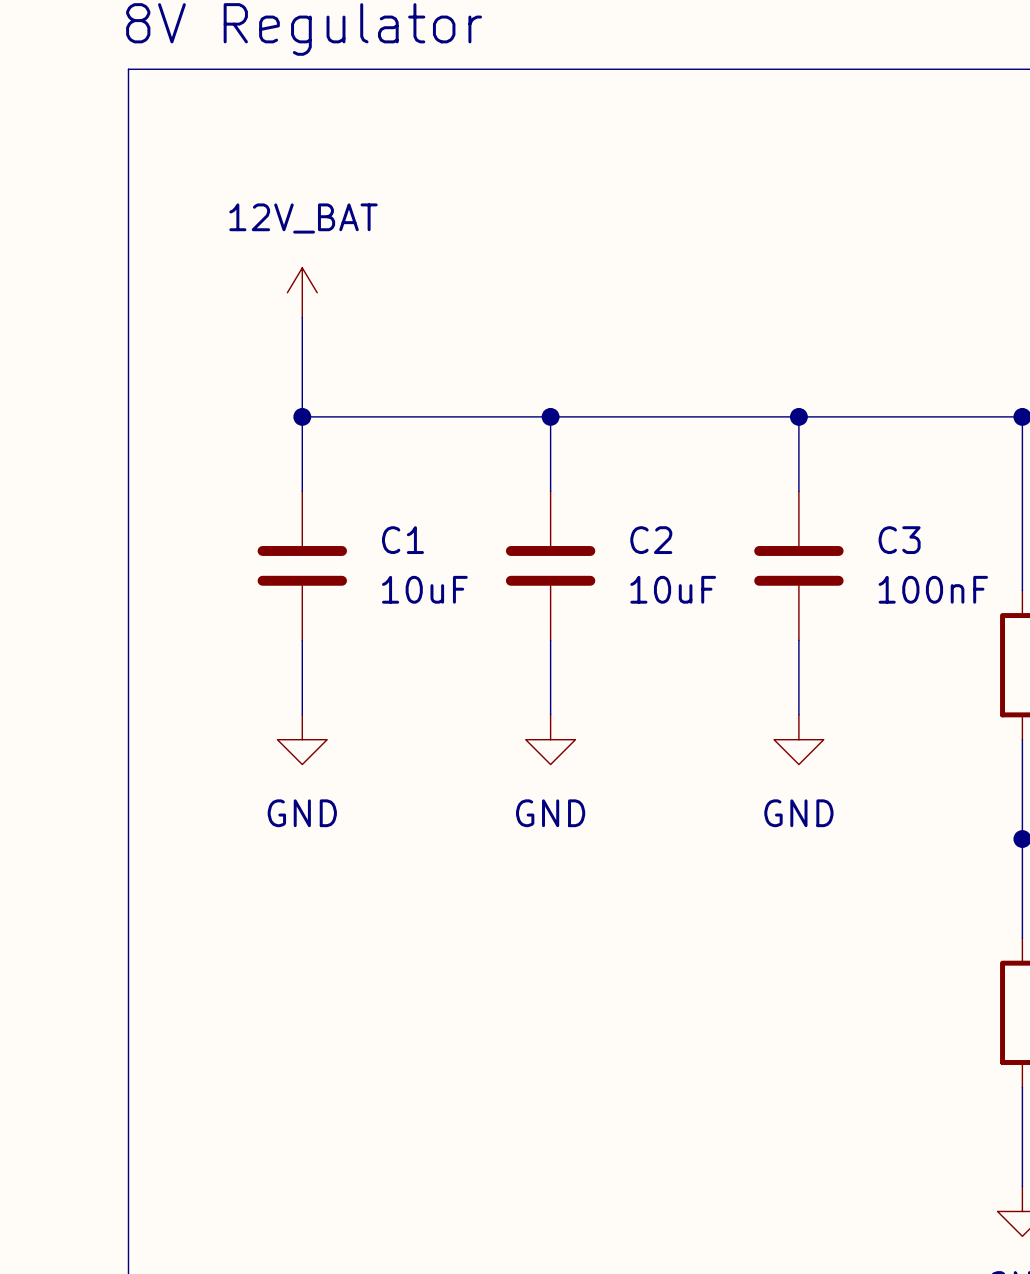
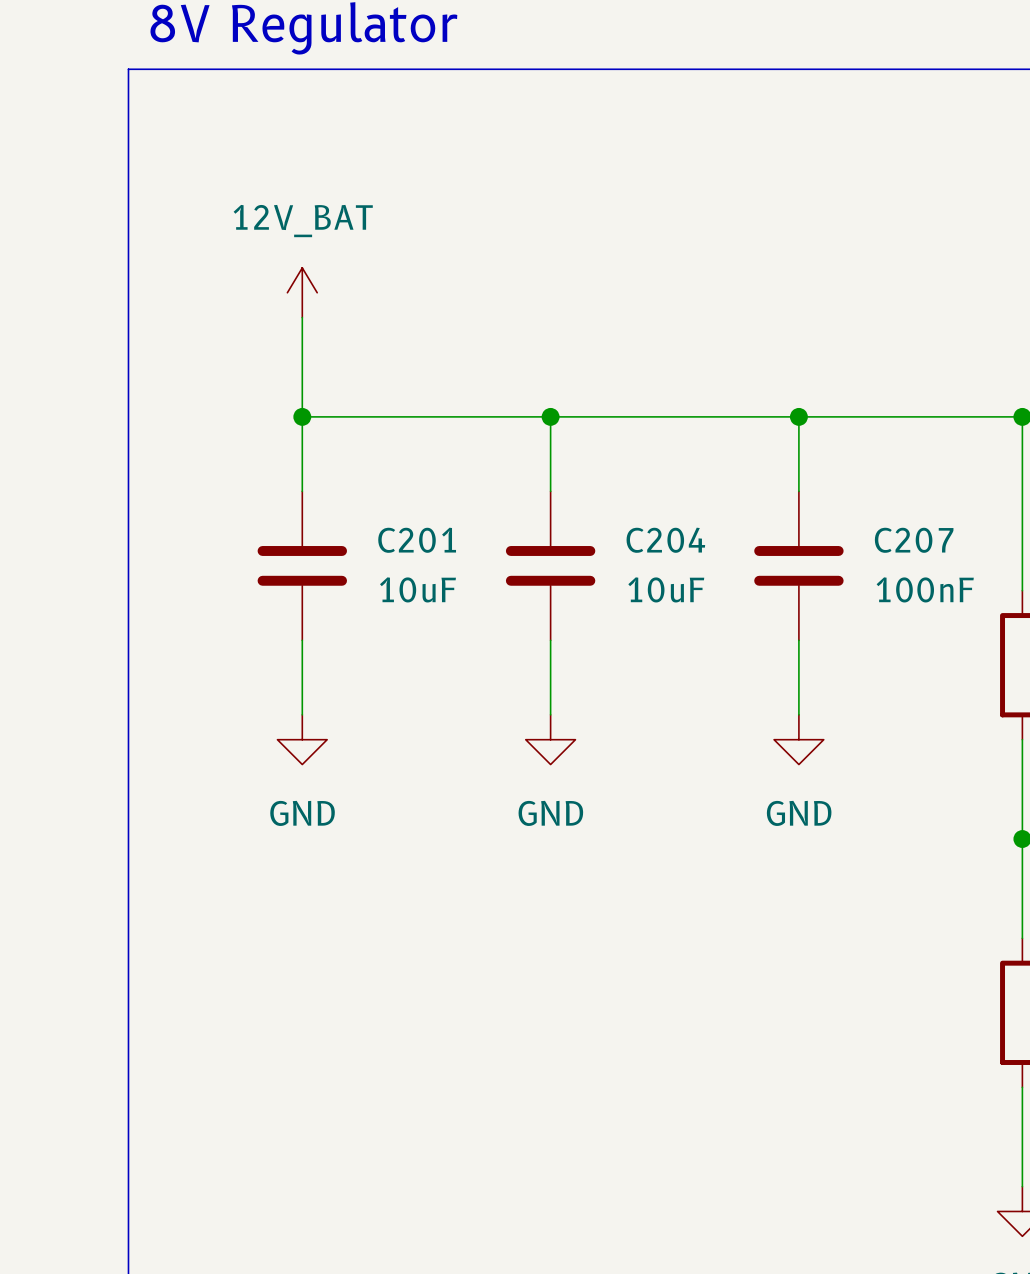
C1 name: C1 (402, 540) -> C201 (417, 540)
C2 name: C2 (651, 540) -> C204 (665, 540)
C3 name: C3 (899, 540) -> C207 (914, 540)

